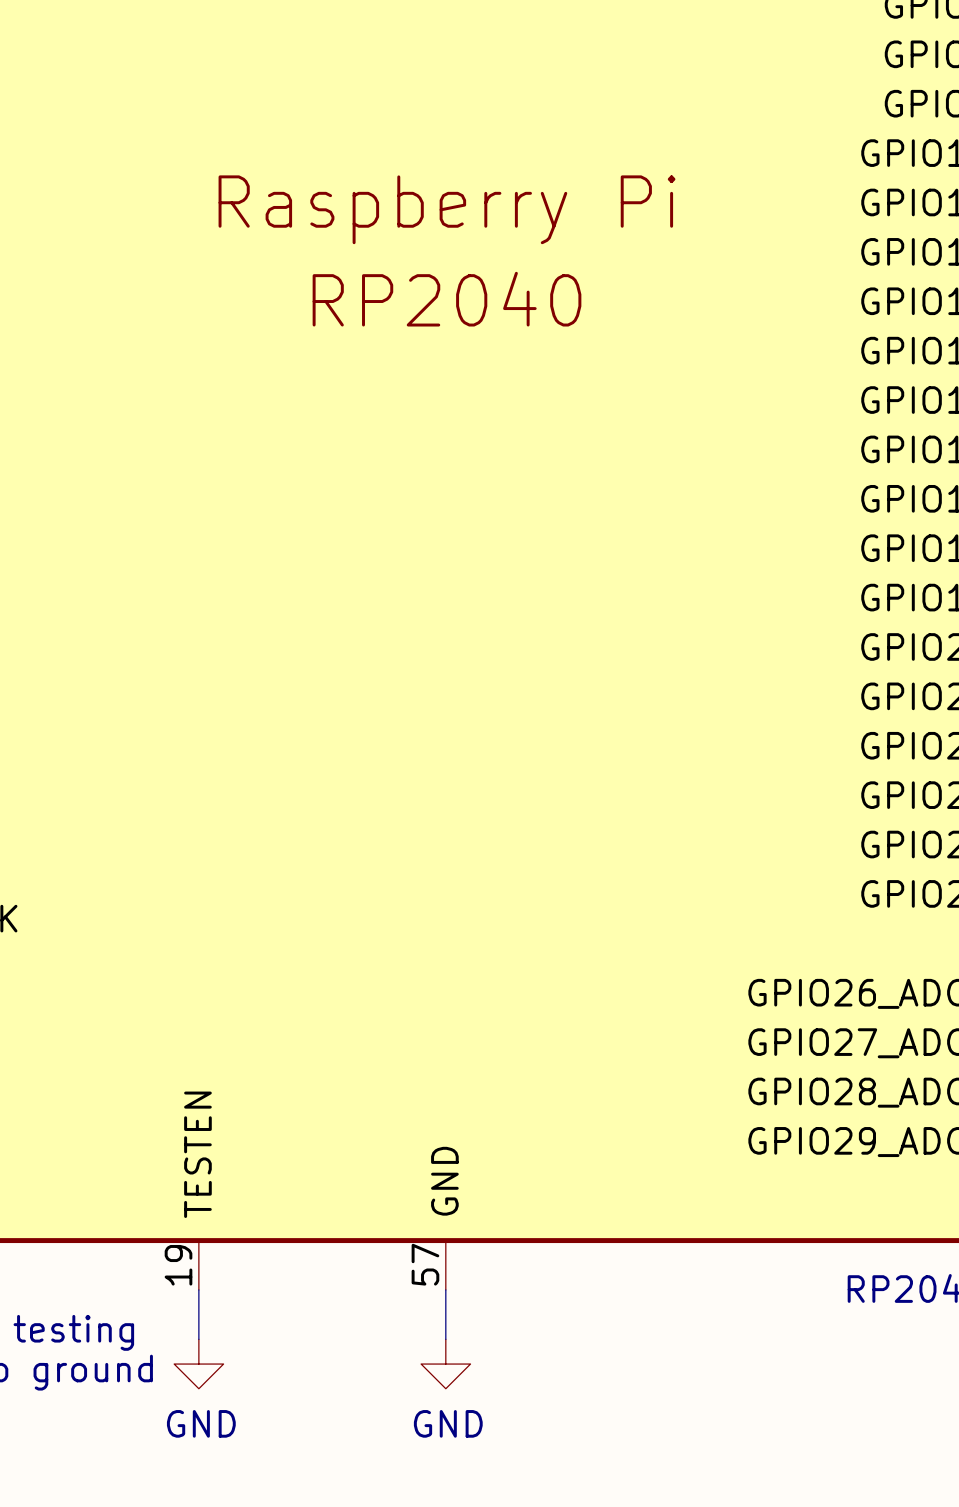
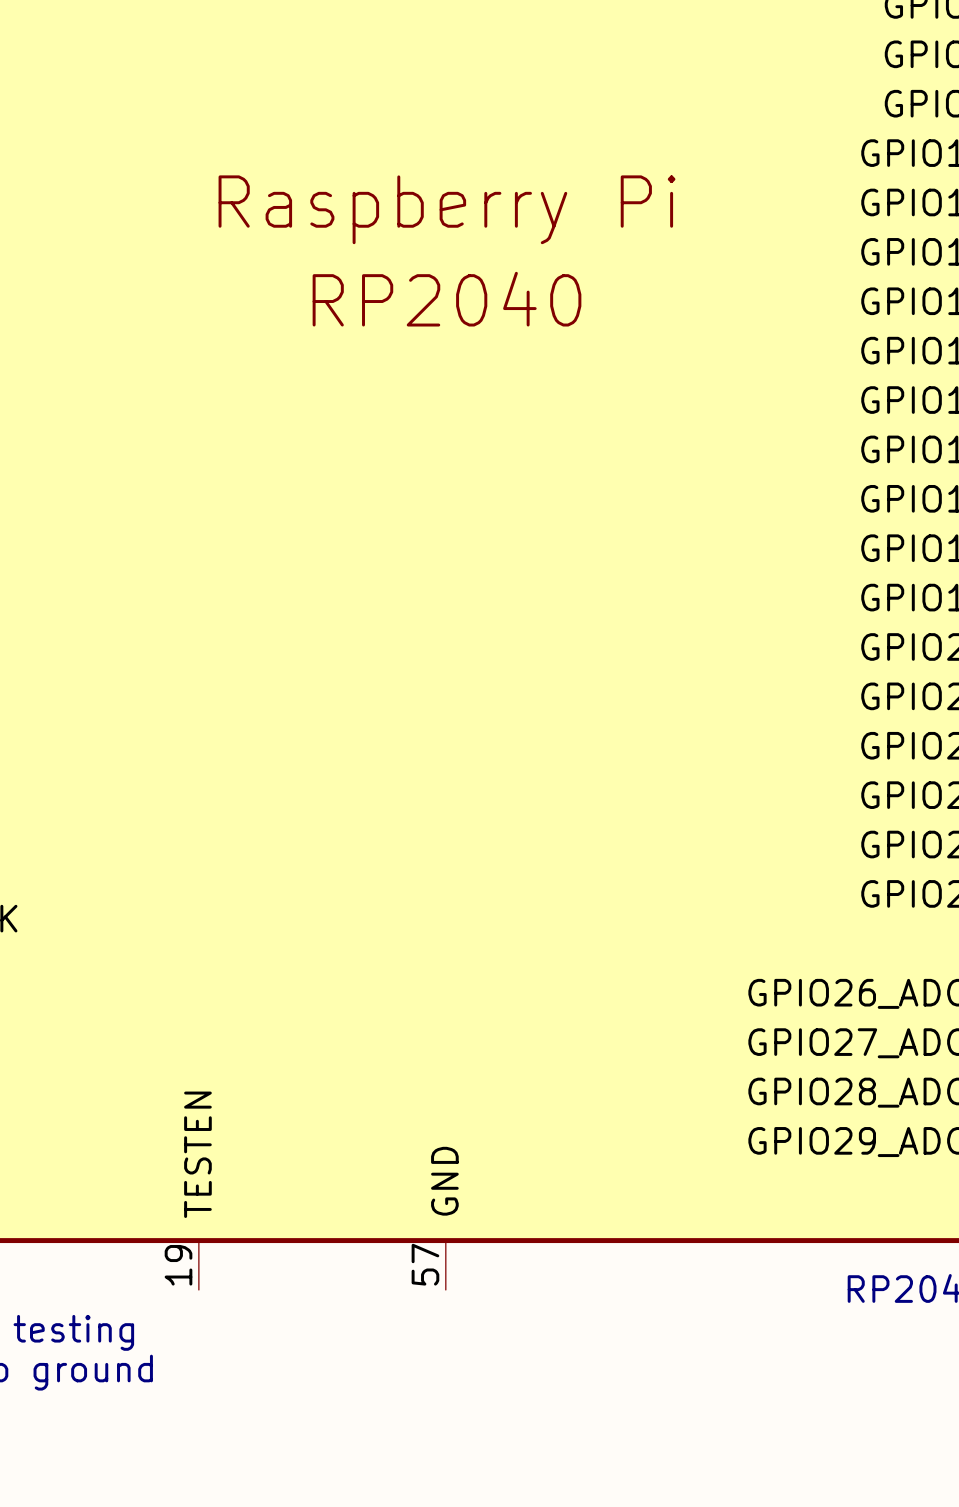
wire: (198, 1289) (198, 1339) -> none
wire: (445, 1289) (445, 1339) -> none
power symbol: GND (198, 1364) -> none
power symbol: GND (445, 1364) -> none

